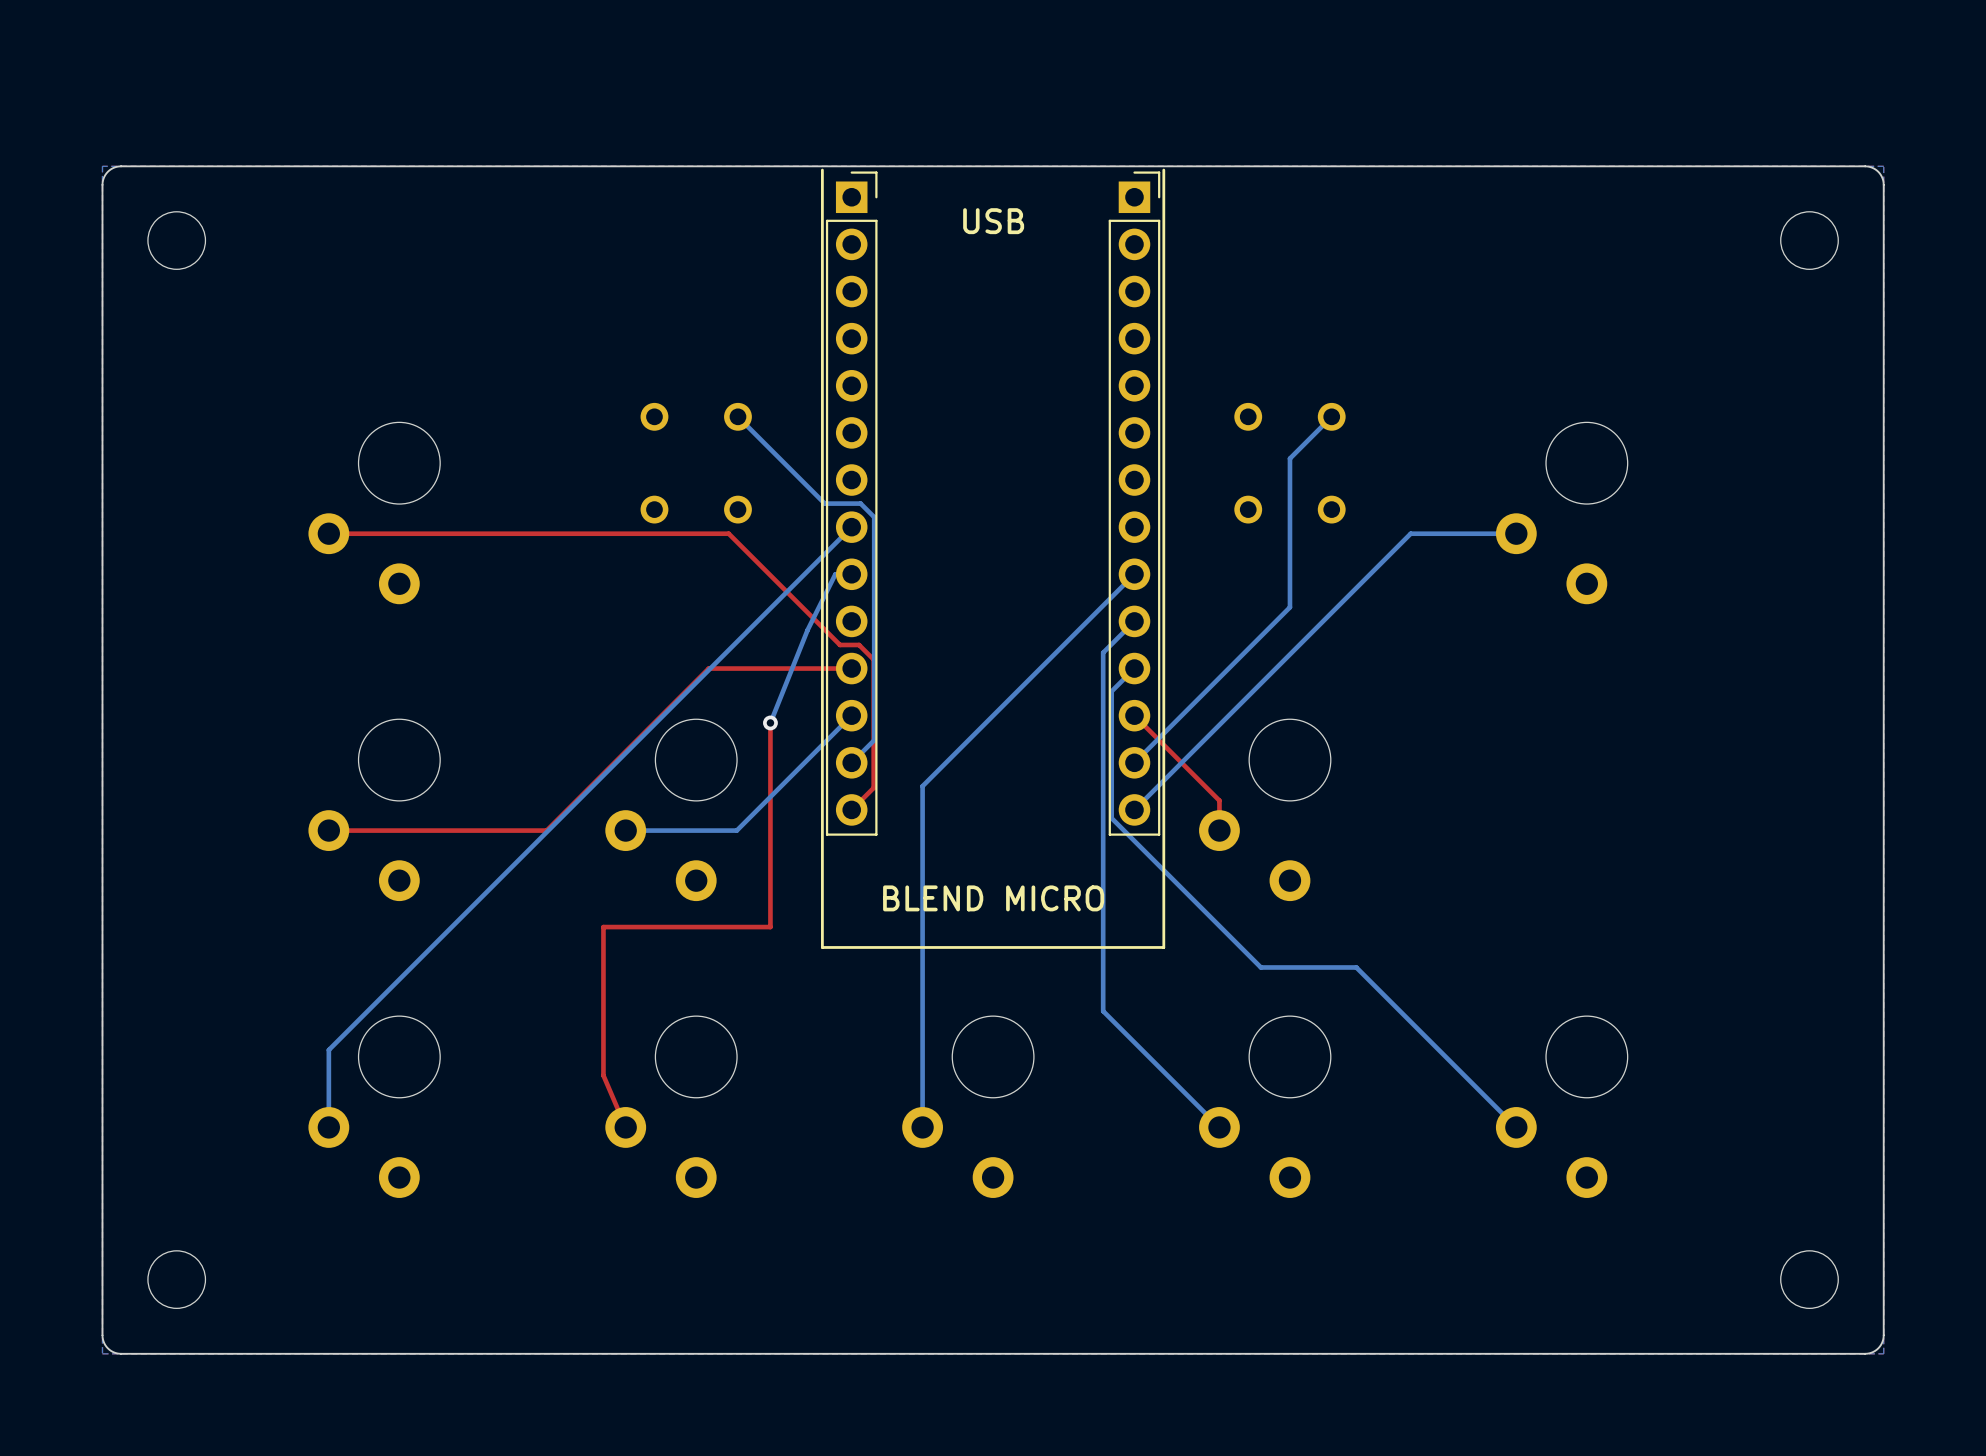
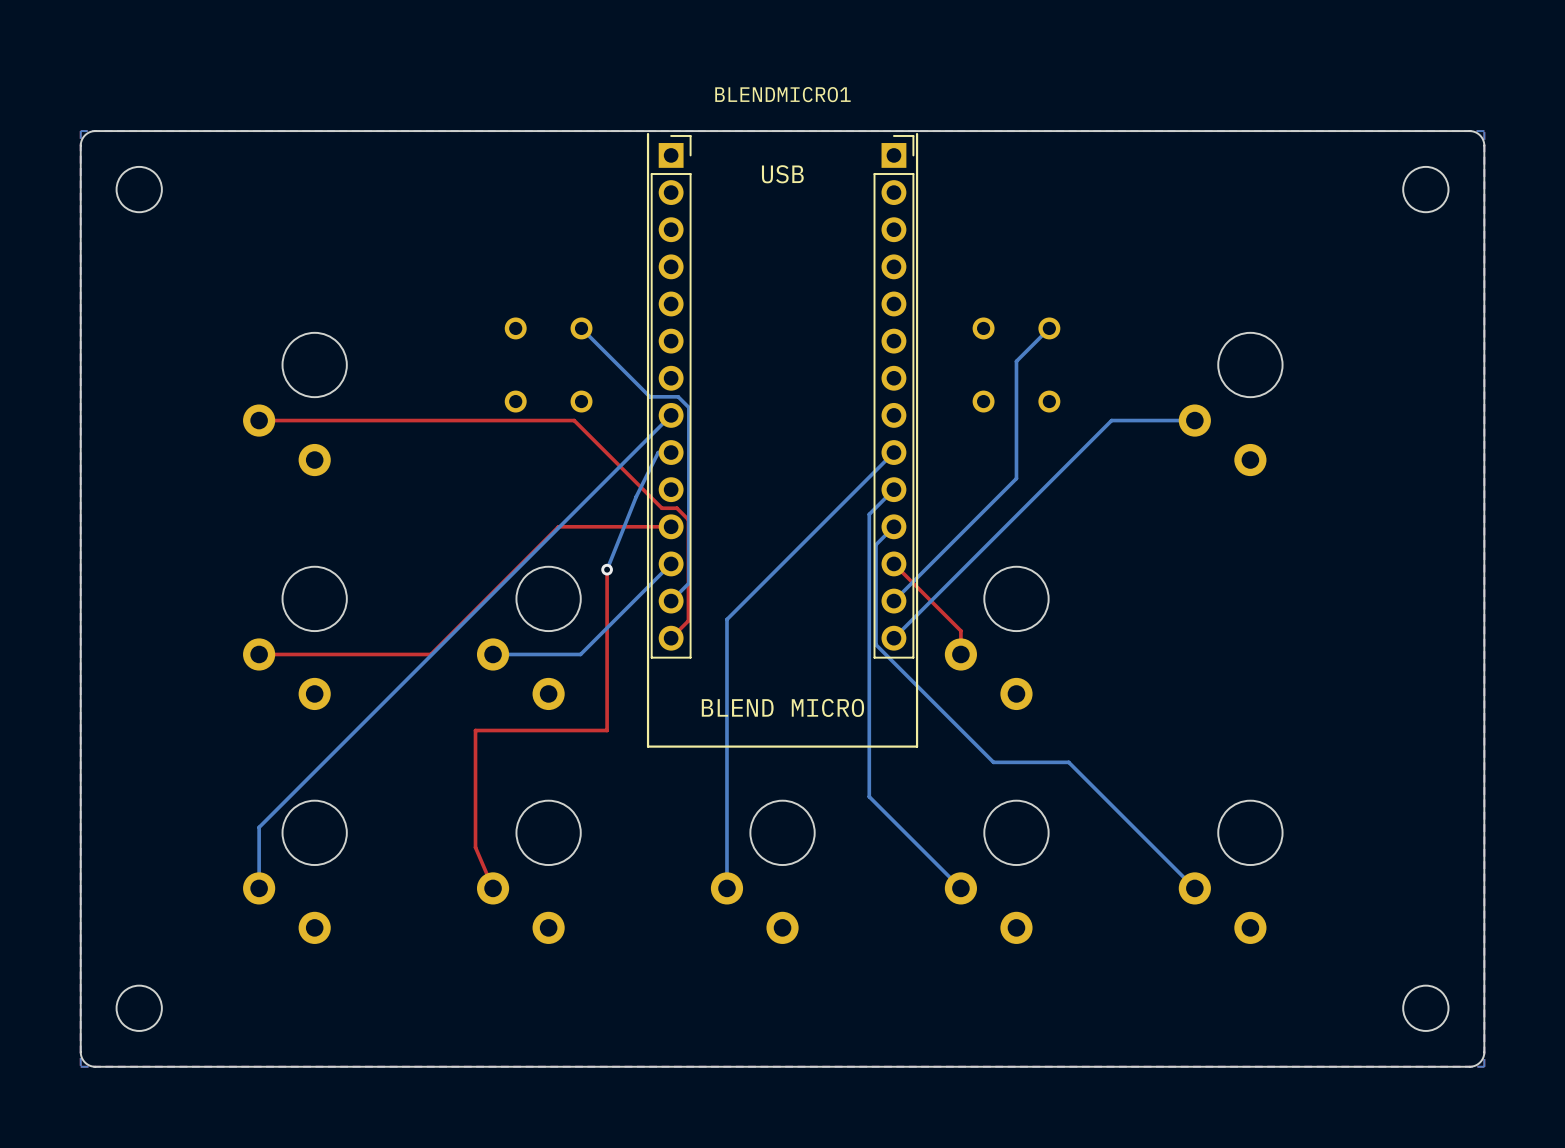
BLENDMICRO1: none -> (782, 94)

